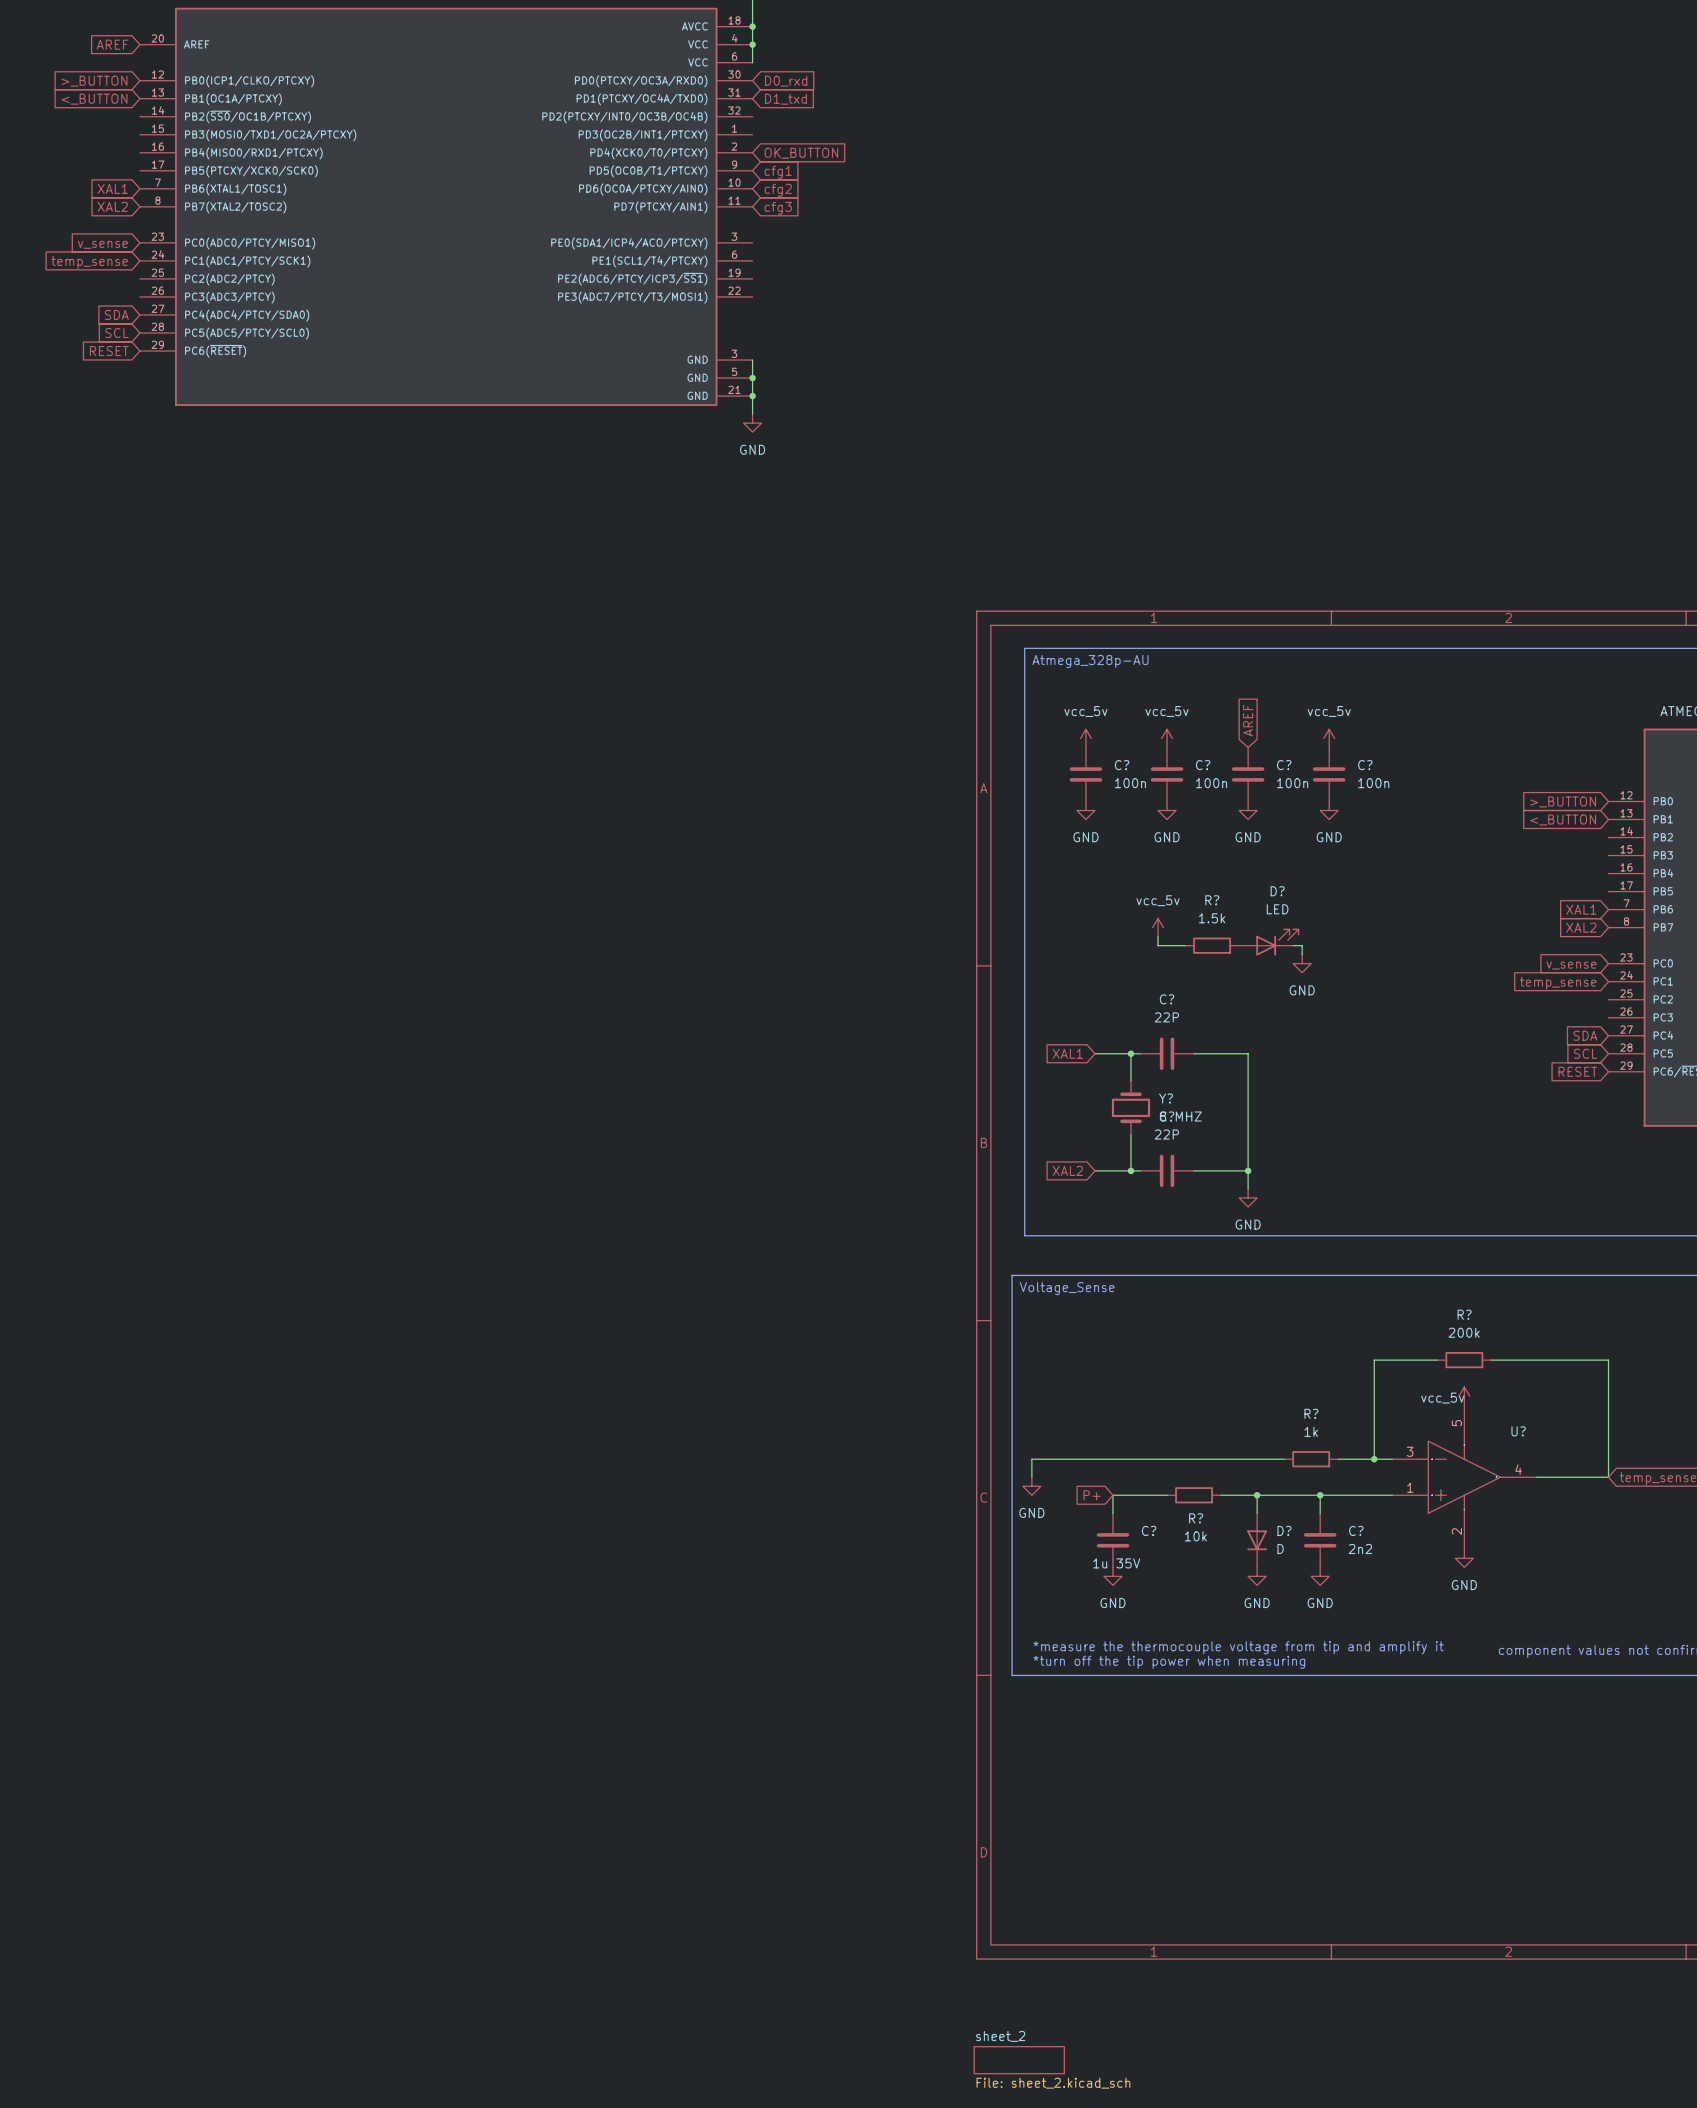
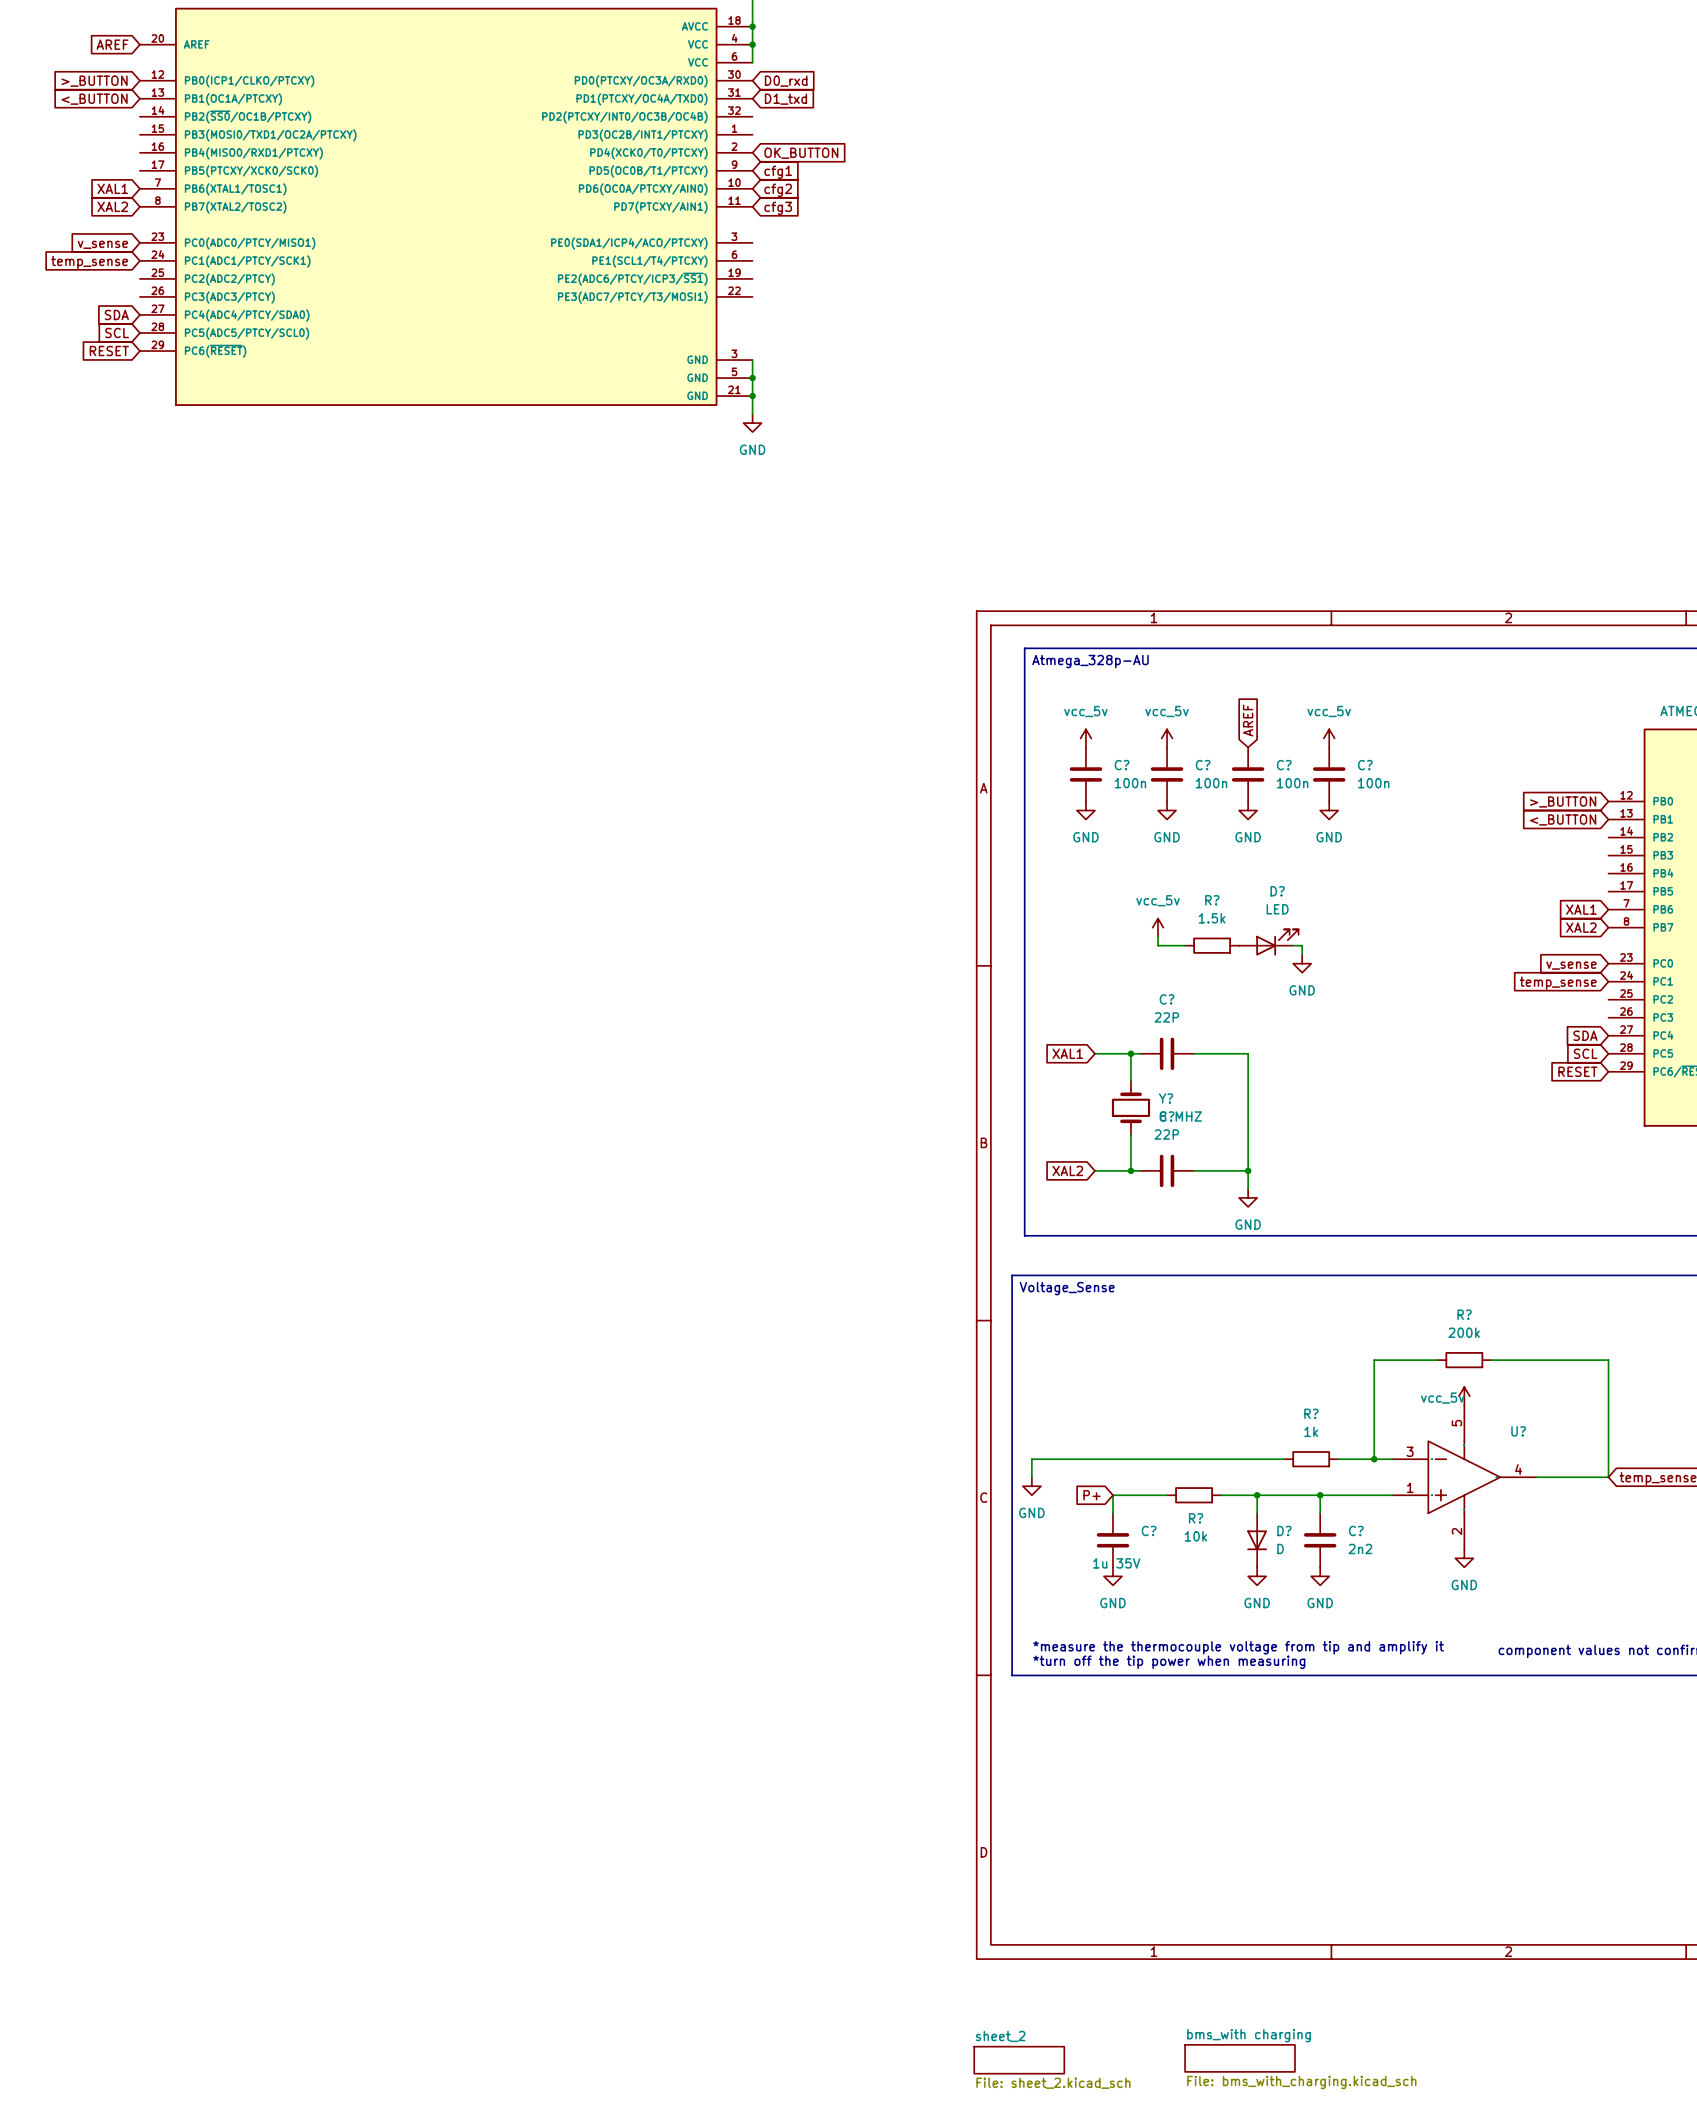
sheet bms_with charging: none -> File: bms_with_charging.kicad_sch (1240, 2058)

